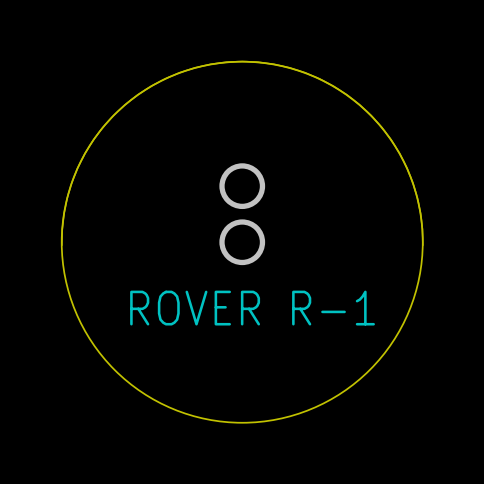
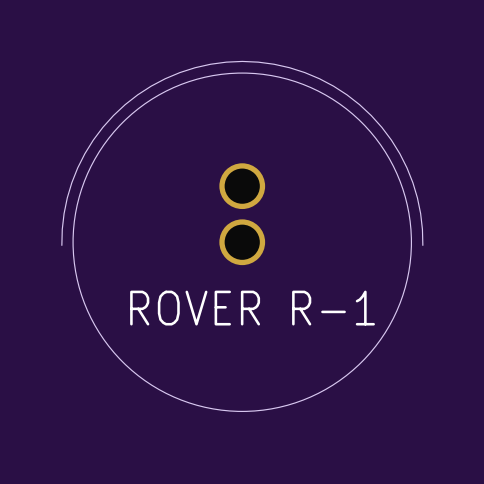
round board edge size: [60, 60, 424, 424] -> [72, 72, 412, 412]

